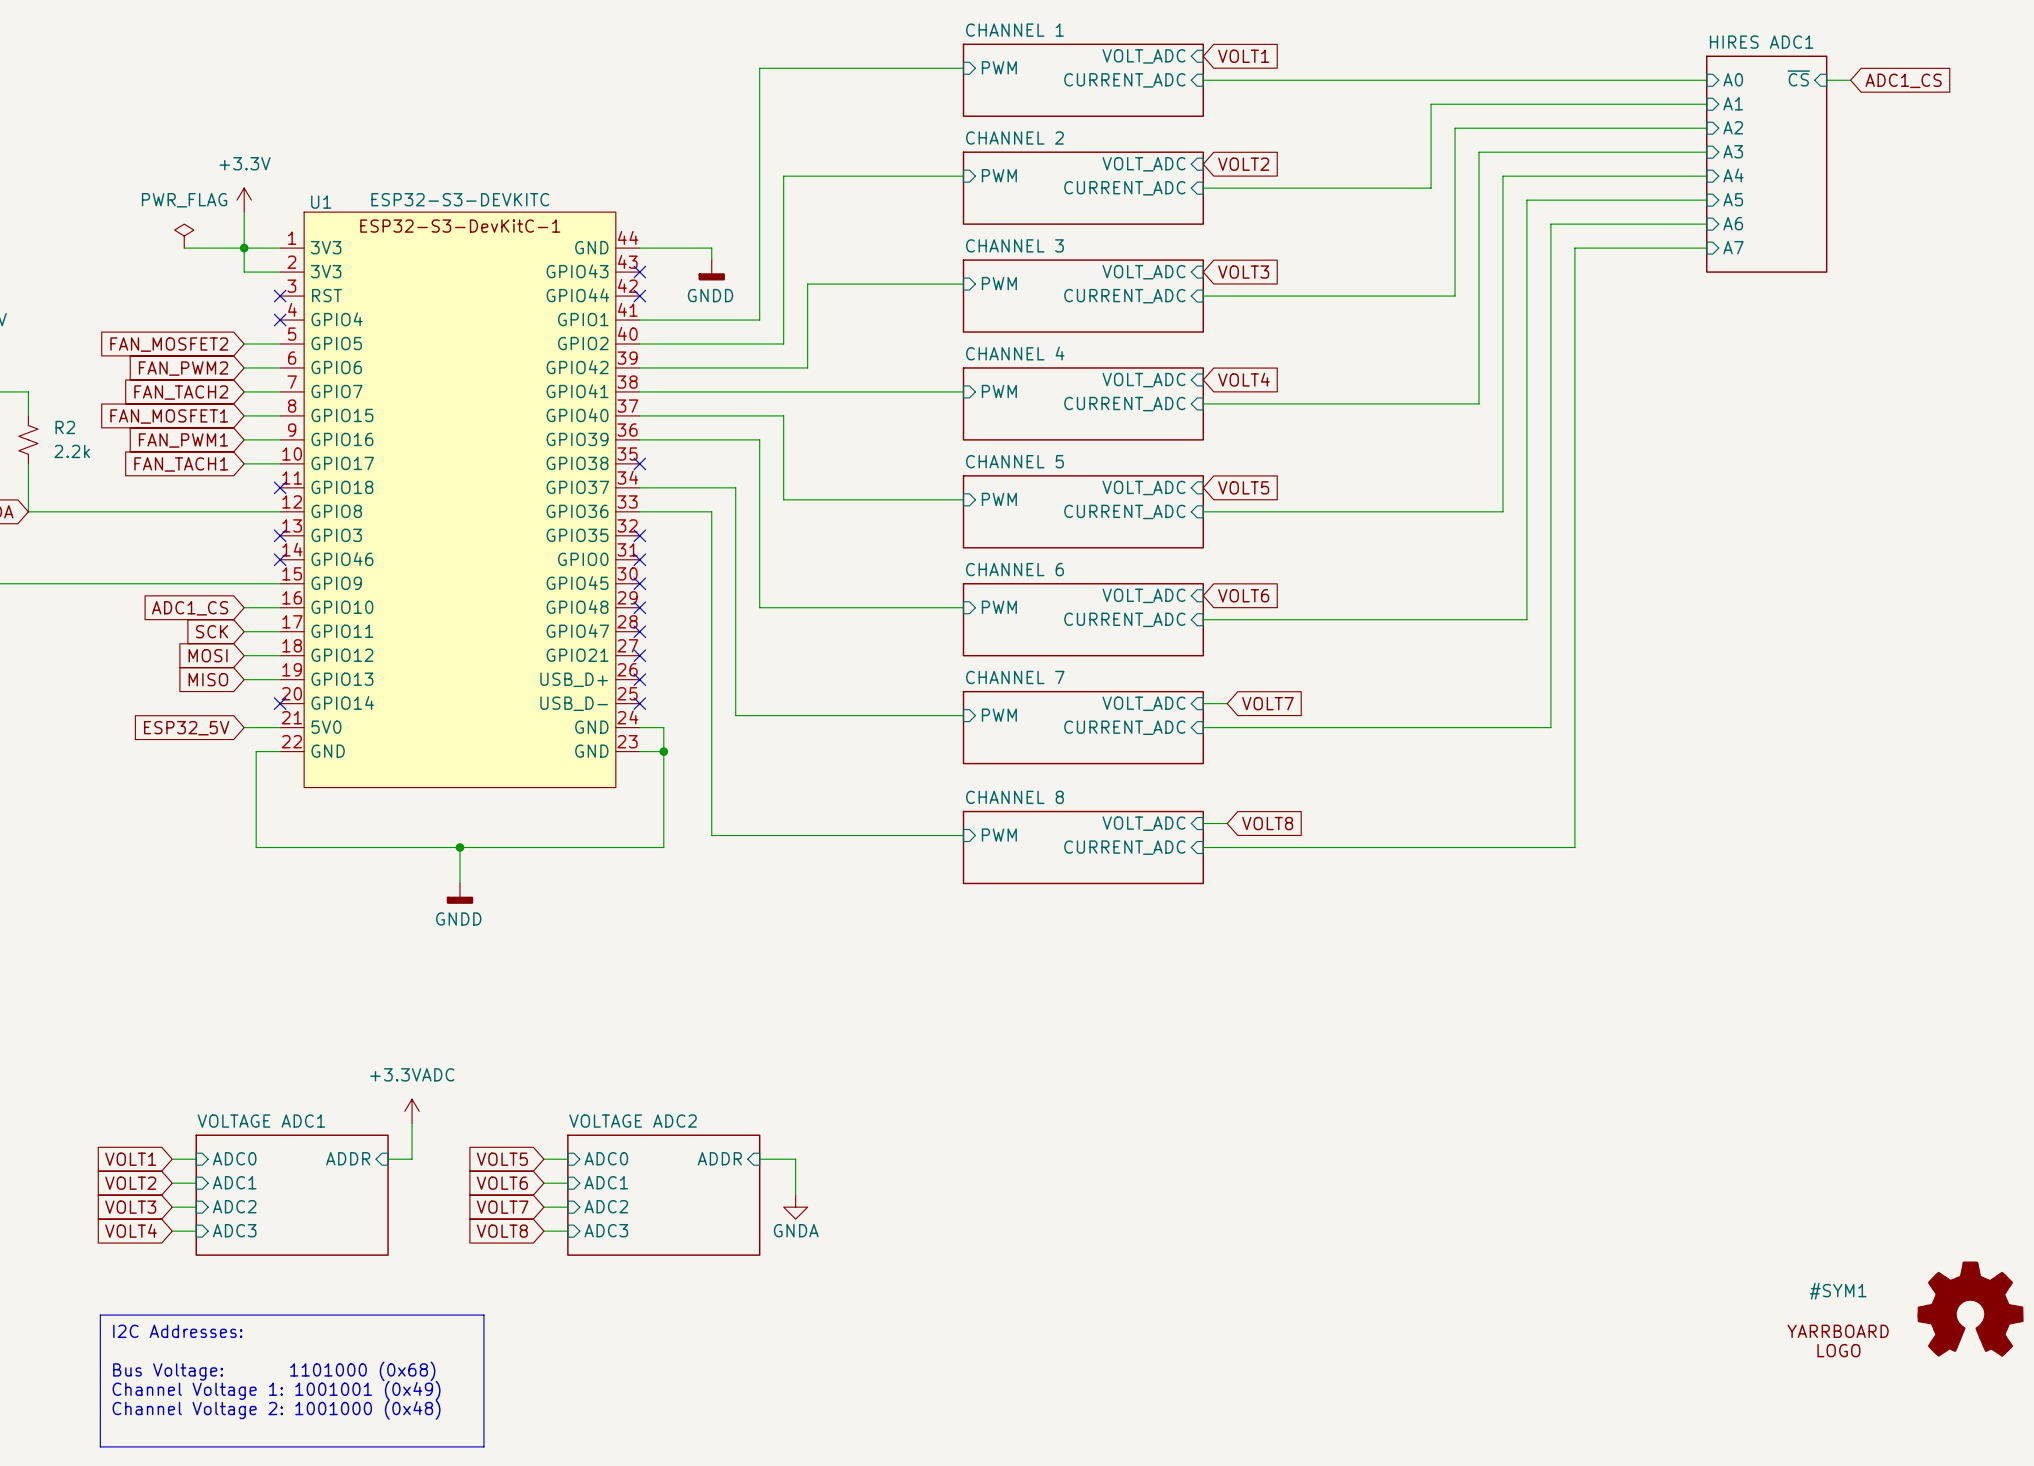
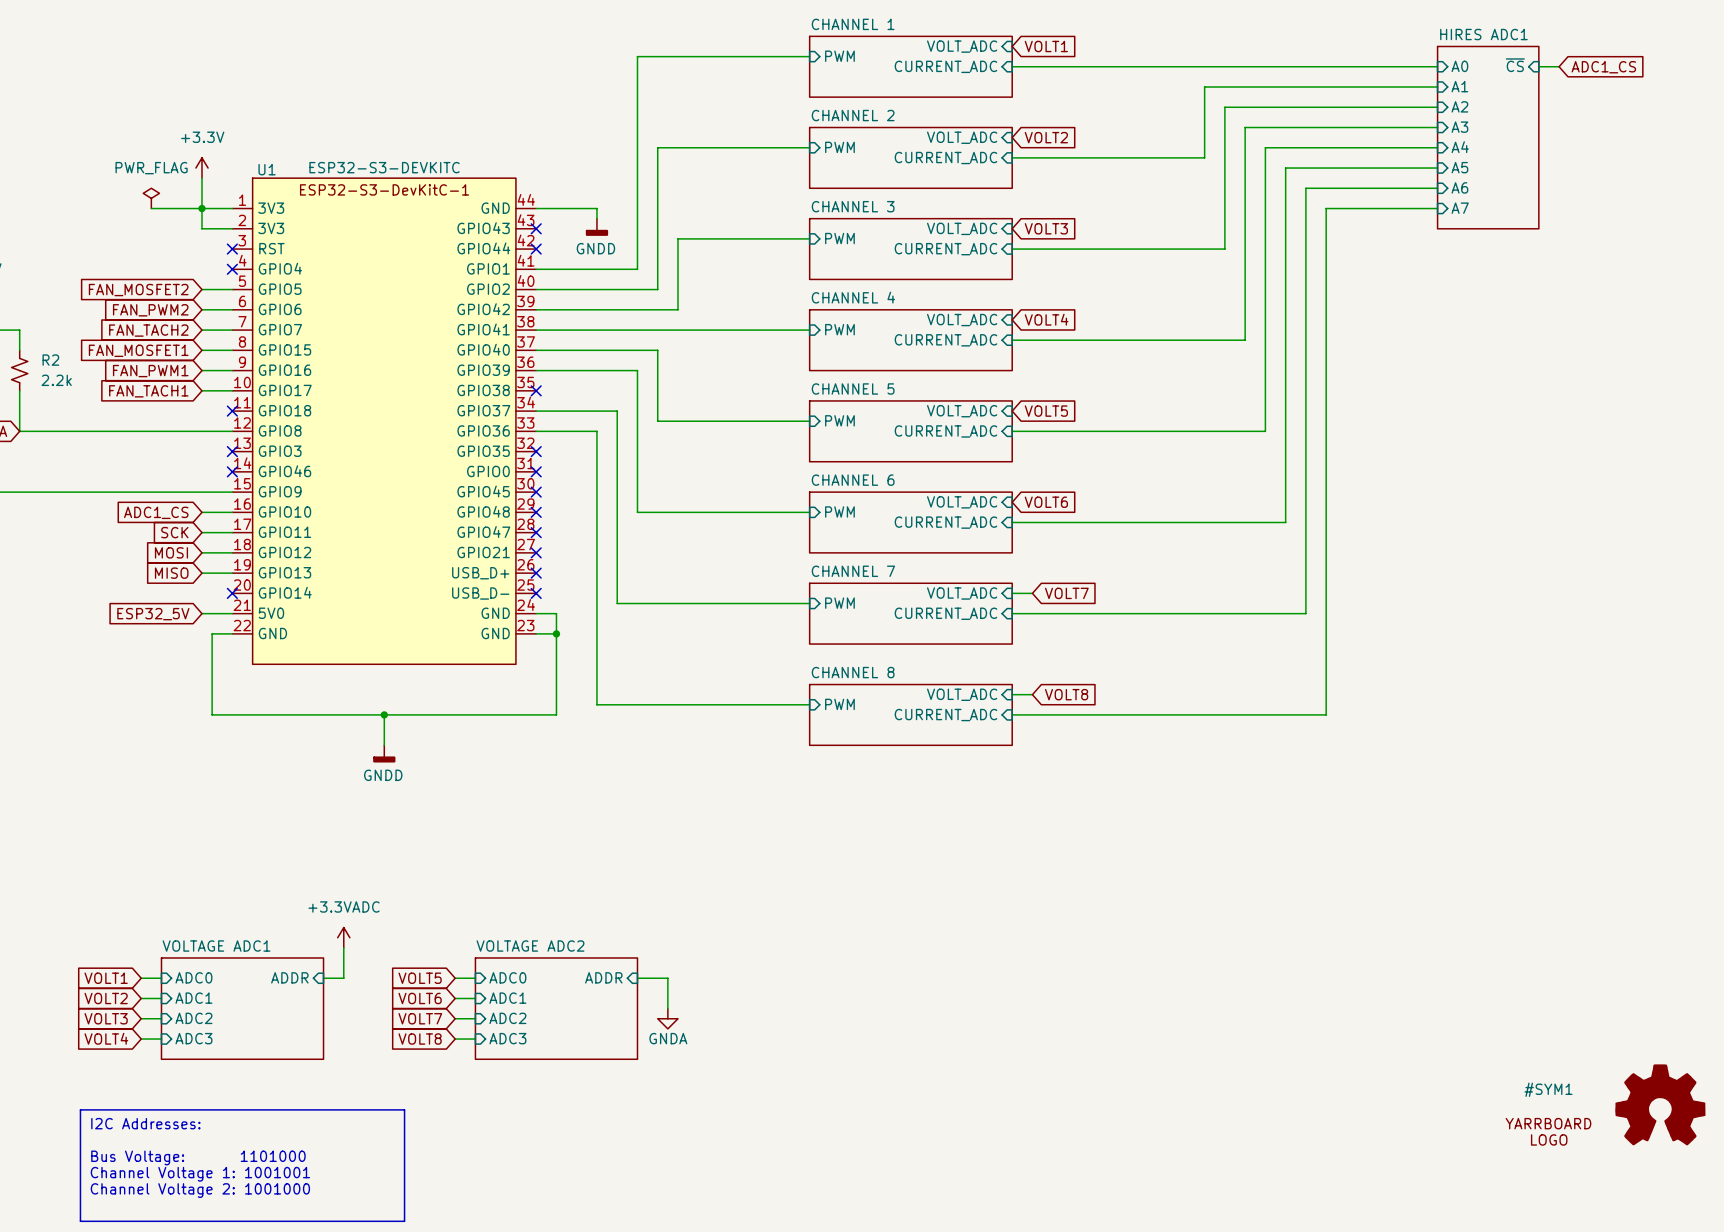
text: Bus Voltage: 1101000 (0x68) (274, 1371) -> Bus Voltage: 1101000 (198, 1157)
text: Channel Voltage 1: 1001001 (0x49) (276, 1390) -> Channel Voltage 1: 1001001 (200, 1174)
text: Channel Voltage 2: 1001000 (0x48) (276, 1409) -> Channel Voltage 2: 1001000 (200, 1190)

